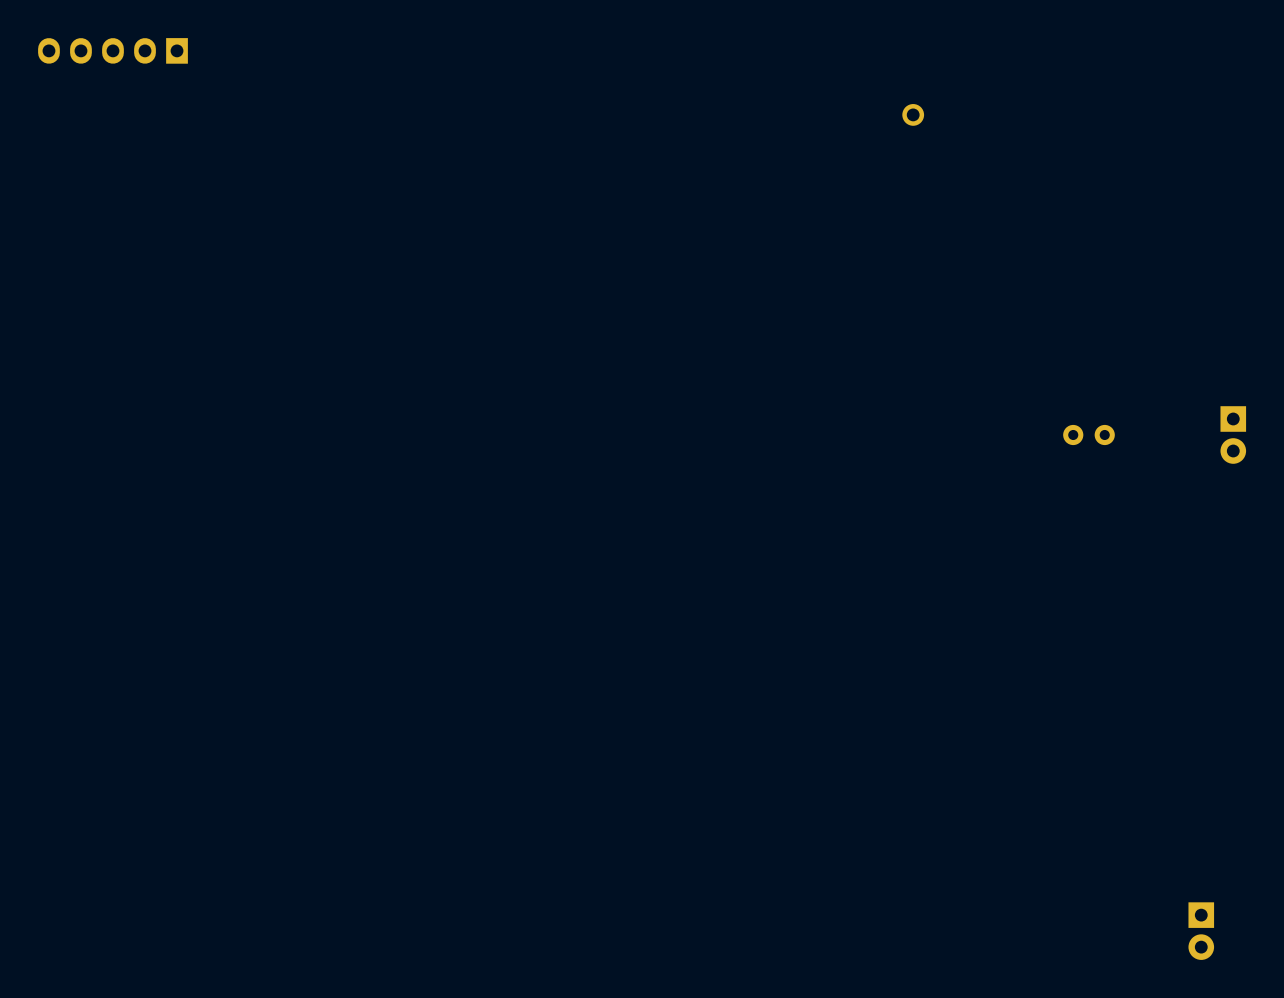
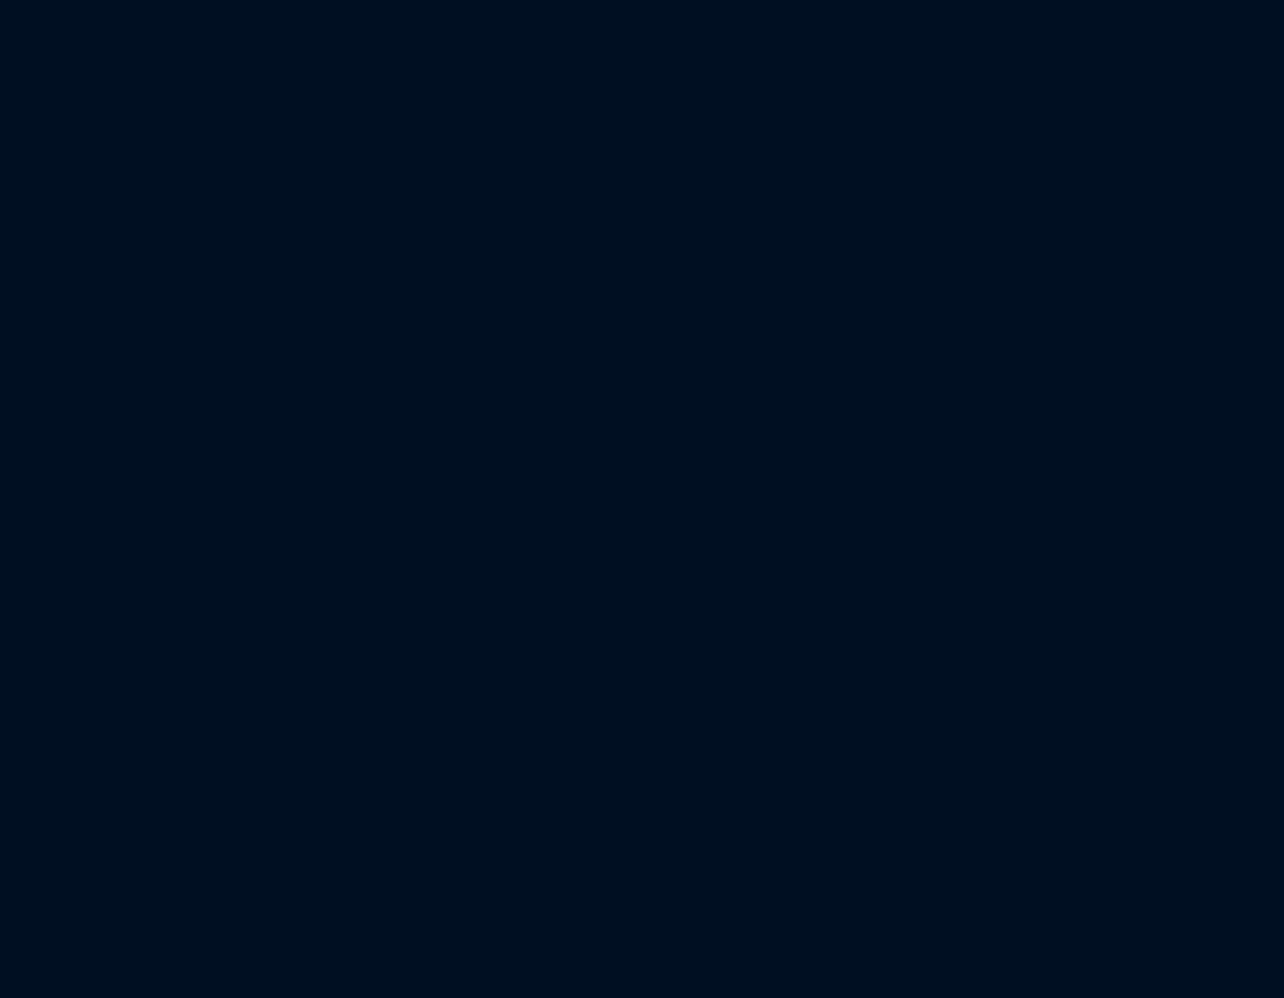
part: (112, 50) -> none
part: (913, 114) -> none
part: (1088, 434) -> none
part: (1233, 434) -> none
part: (1201, 931) -> none

